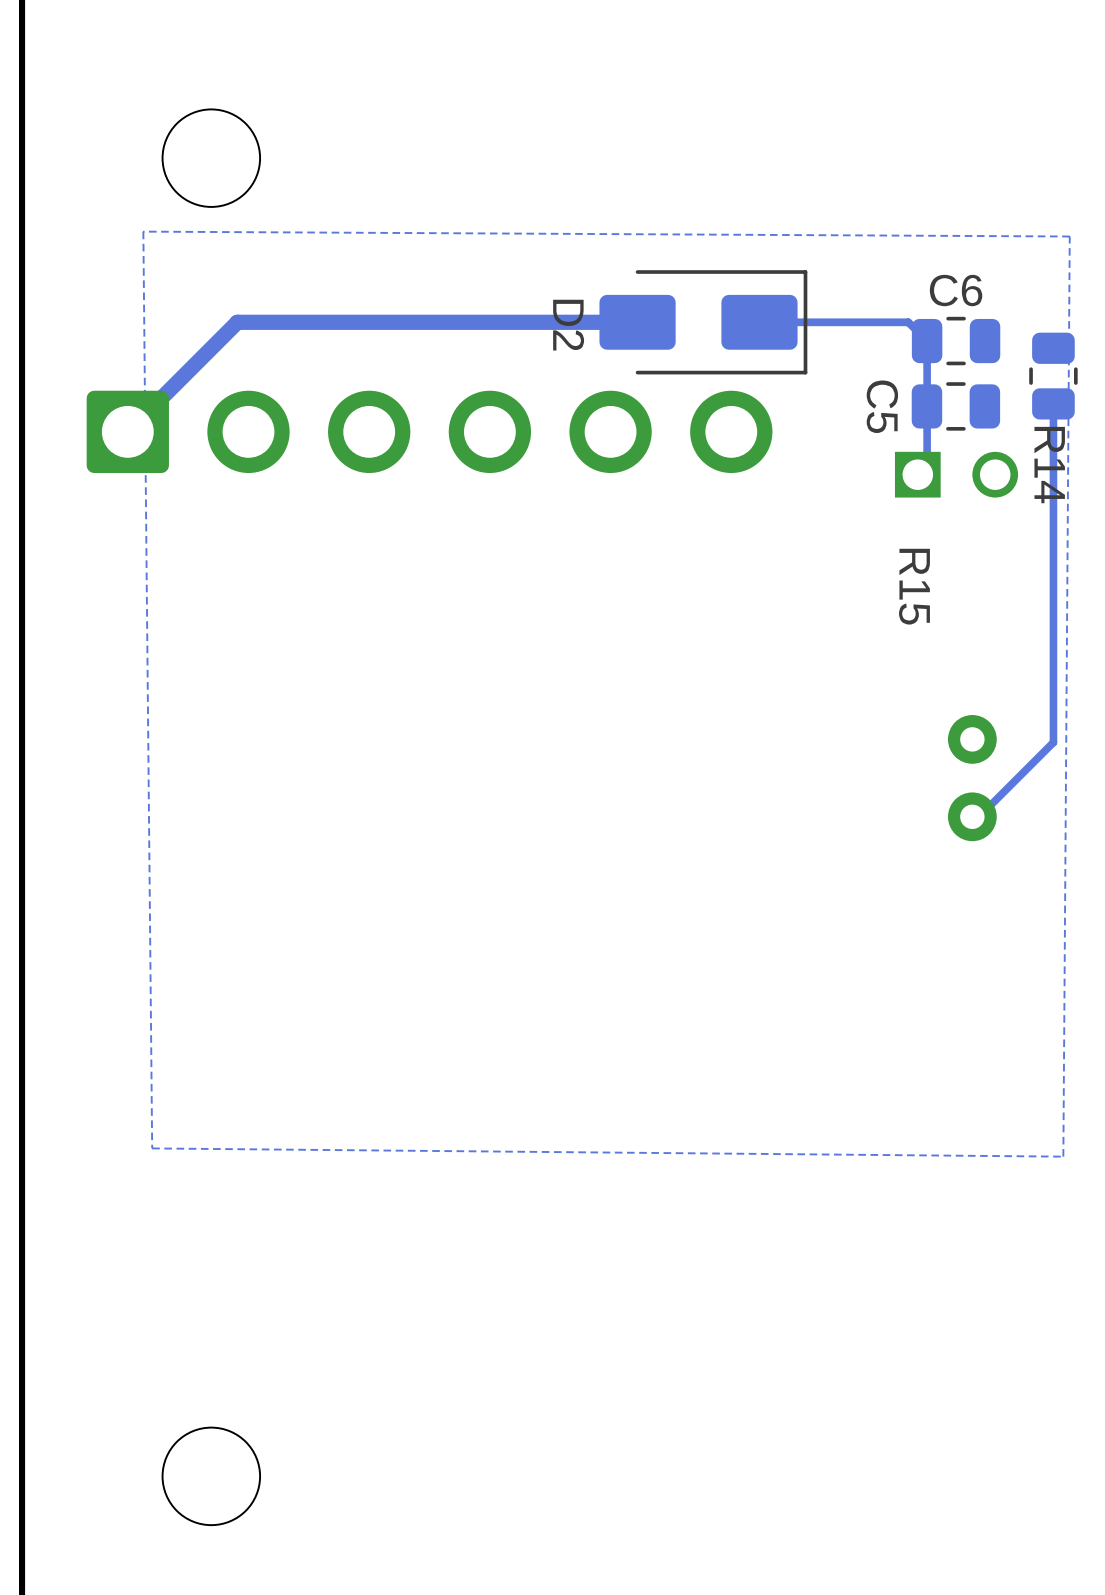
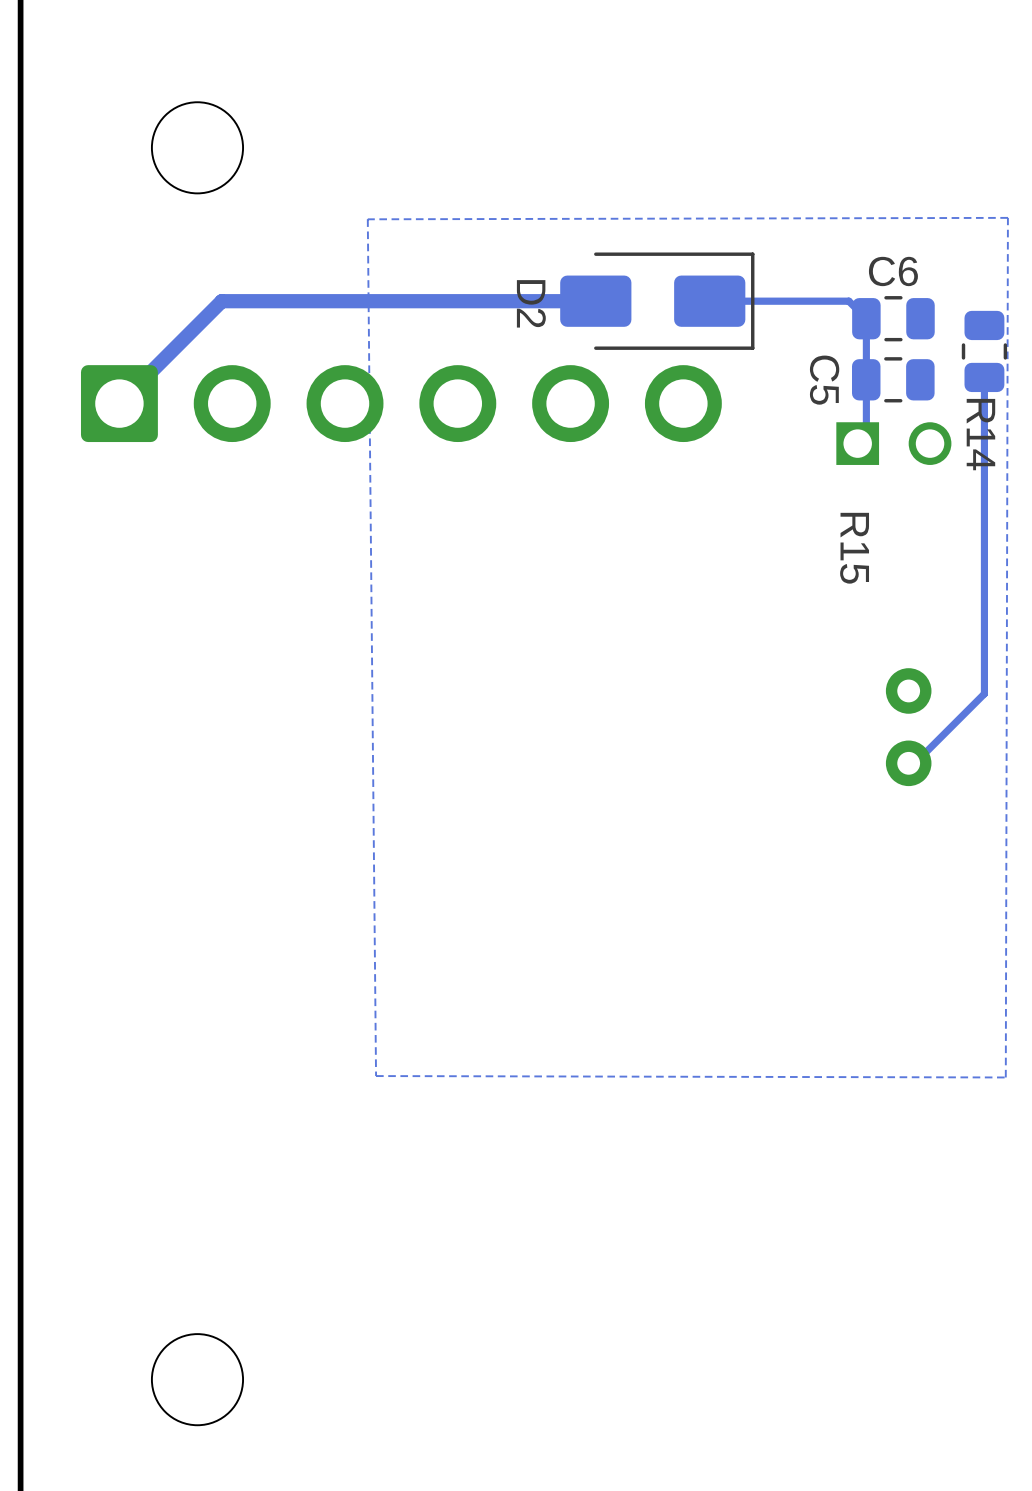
zone outline: (143, 231) (1069, 236) (1063, 1156) (152, 1148) (143, 231) -> (1007, 217) (1005, 1077) (376, 1076) (367, 219) (1007, 217)

